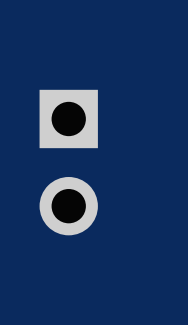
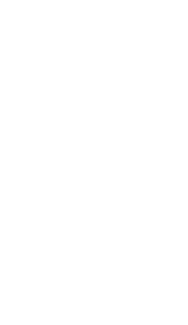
part: (68, 162) -> none

